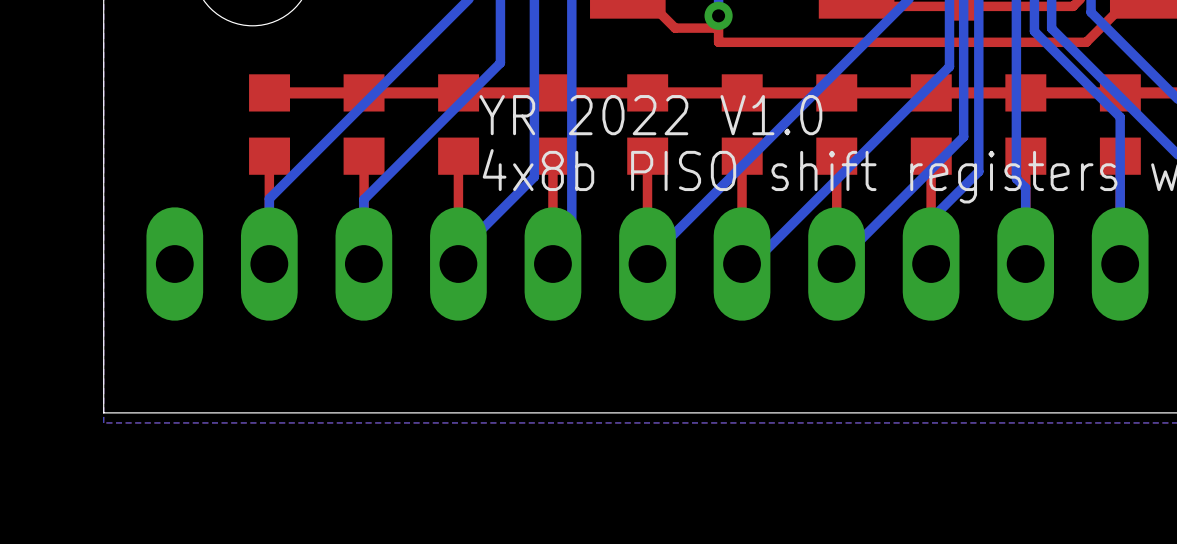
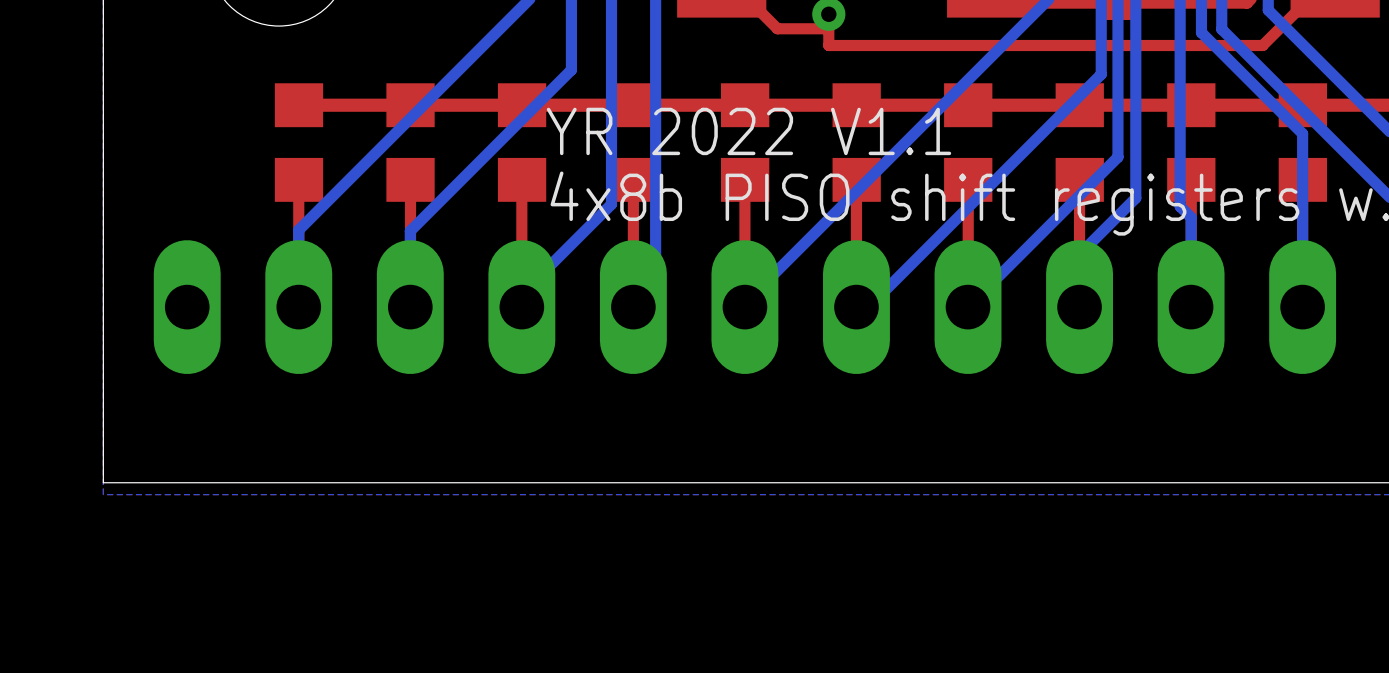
text: YR 2022 V1.0 (650, 115) -> YR 2022 V1.1 (748, 131)

